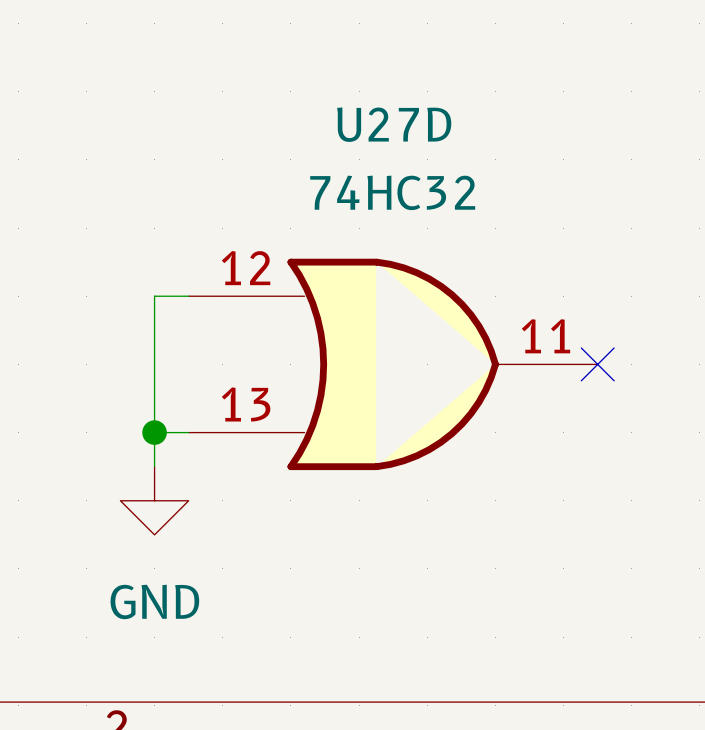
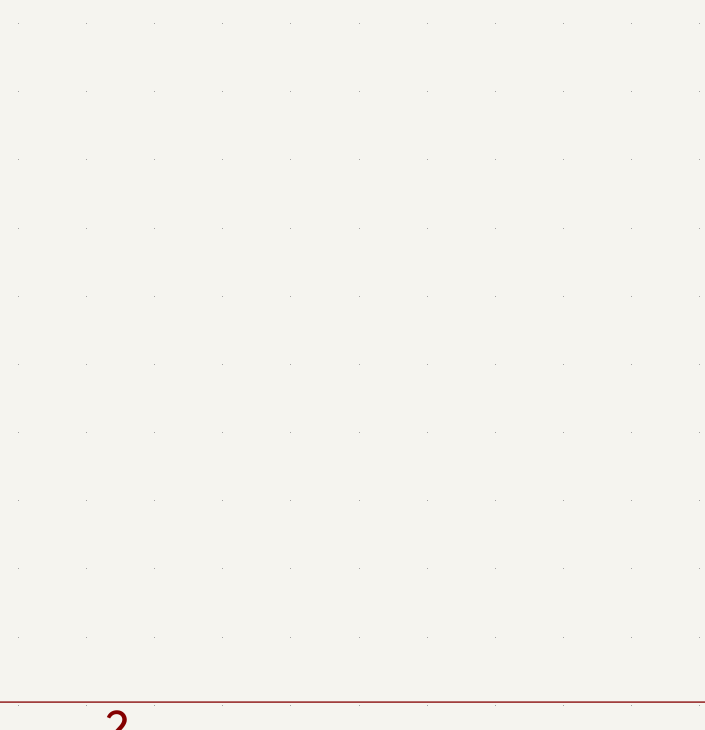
wire: (188, 296) (154, 296) (154, 466) -> none
U27D: 74HC32 (393, 364) -> none
no-connect mark: (597, 364) -> none
wire: (154, 432) (188, 432) -> none
junction: (154, 432) -> none
power symbol: GND (154, 500) -> none

